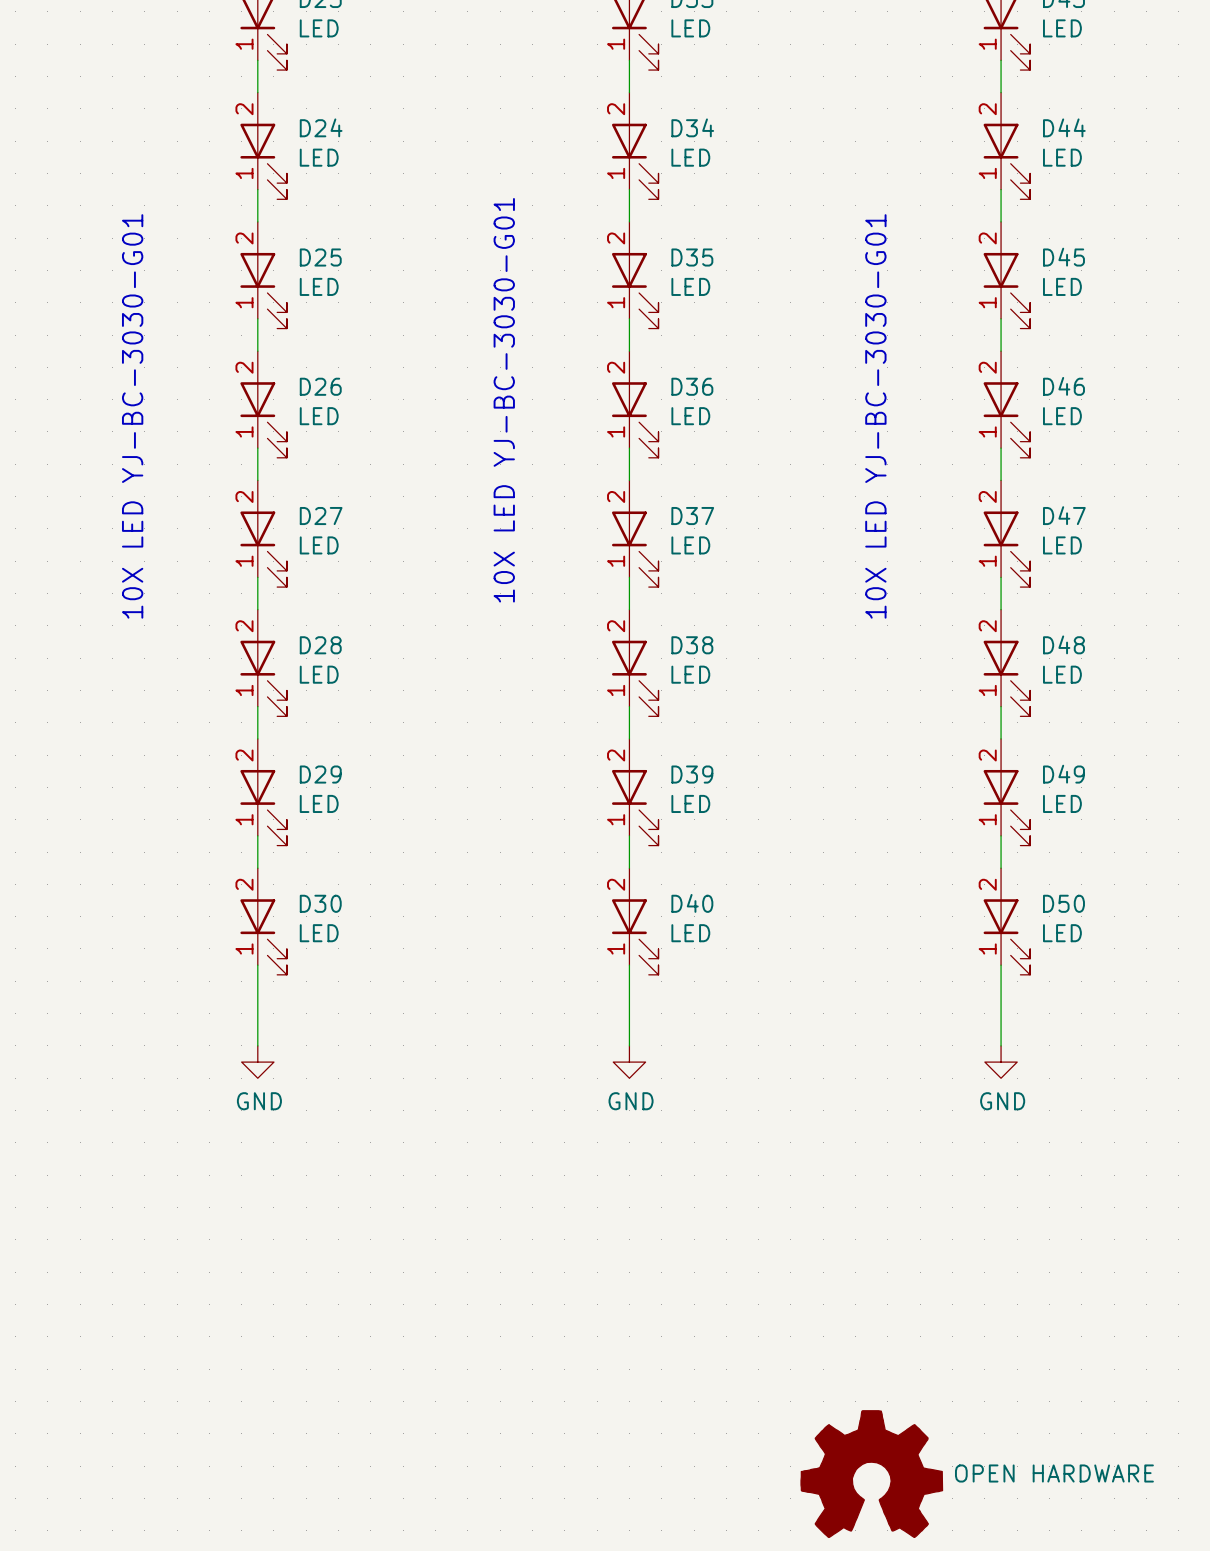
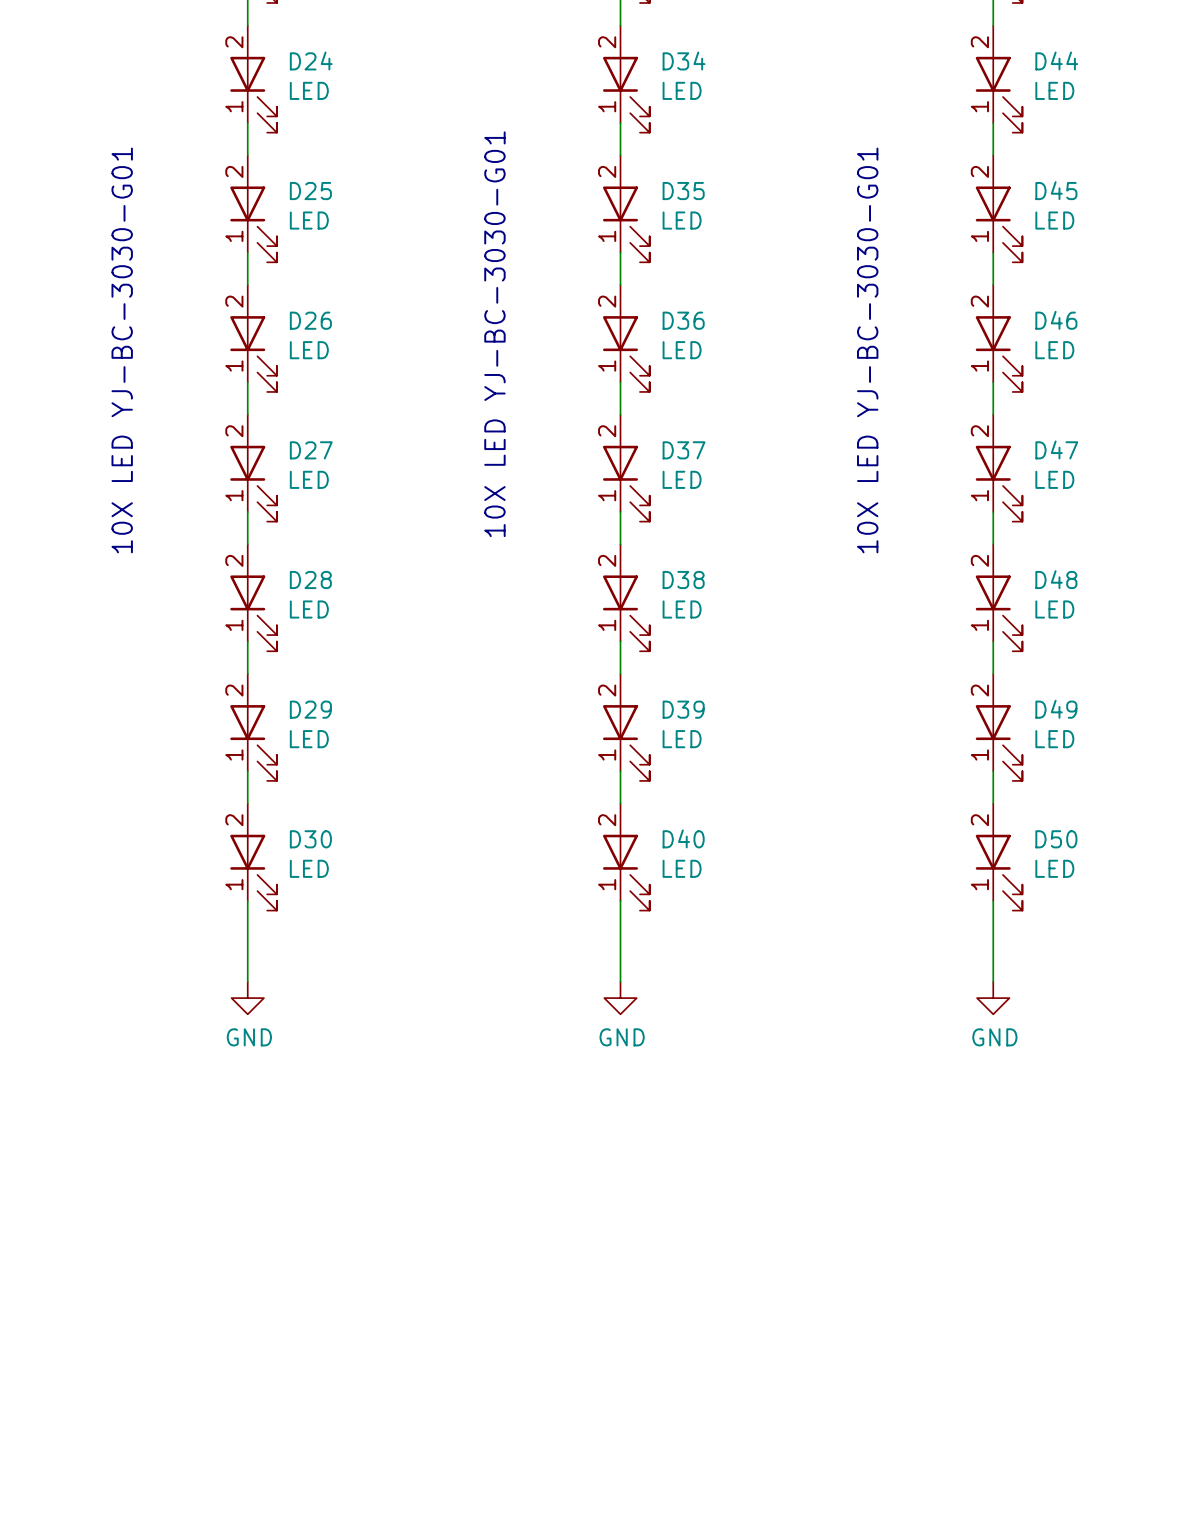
part: OPEN HARDWARE (871, 1474) -> none

